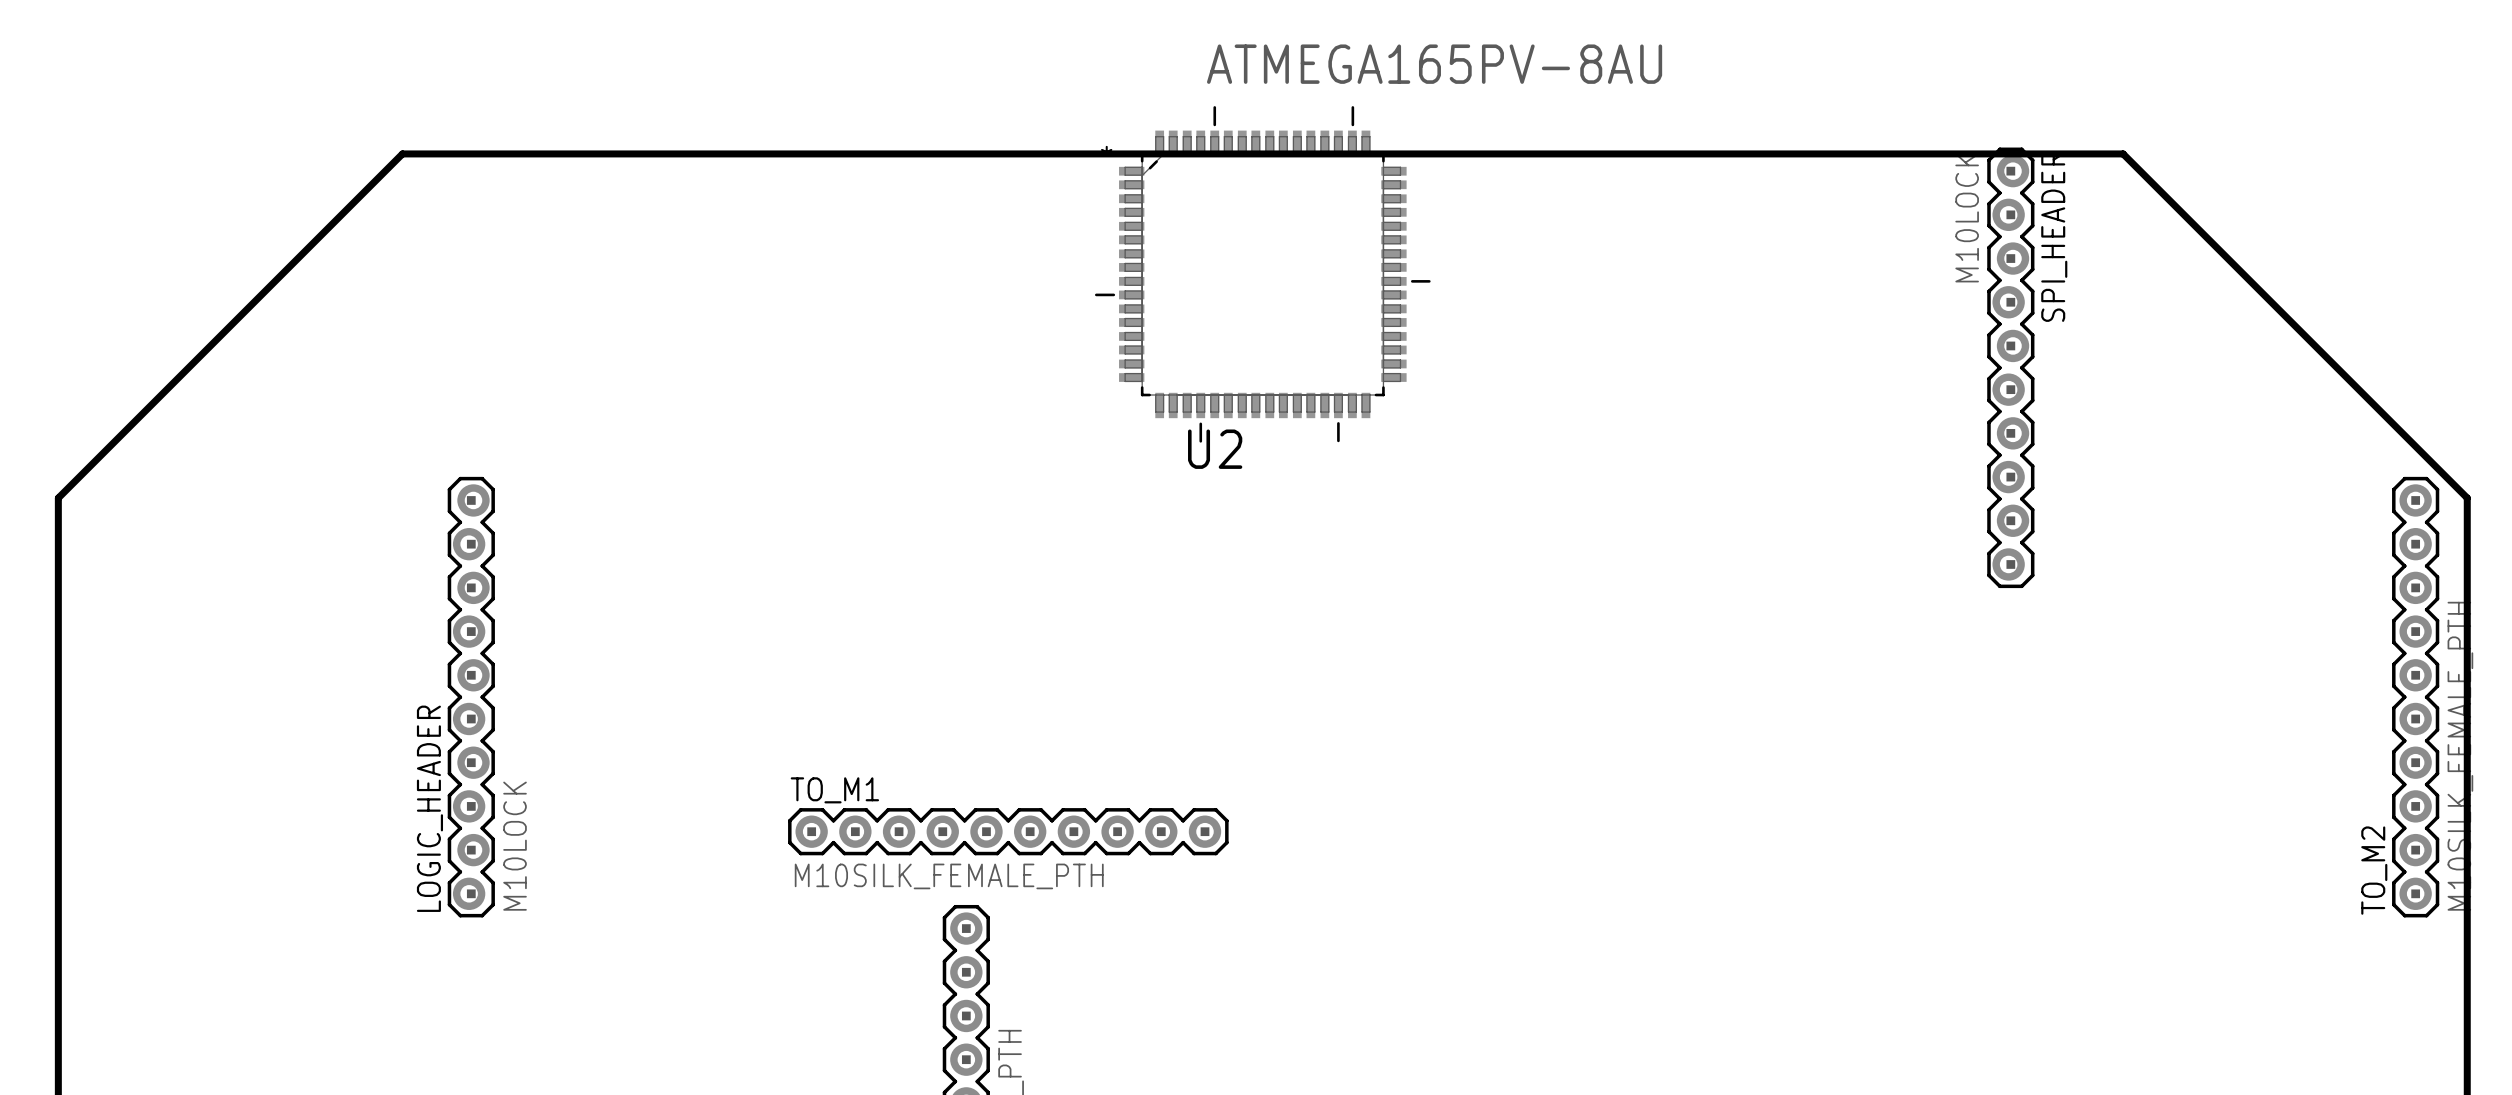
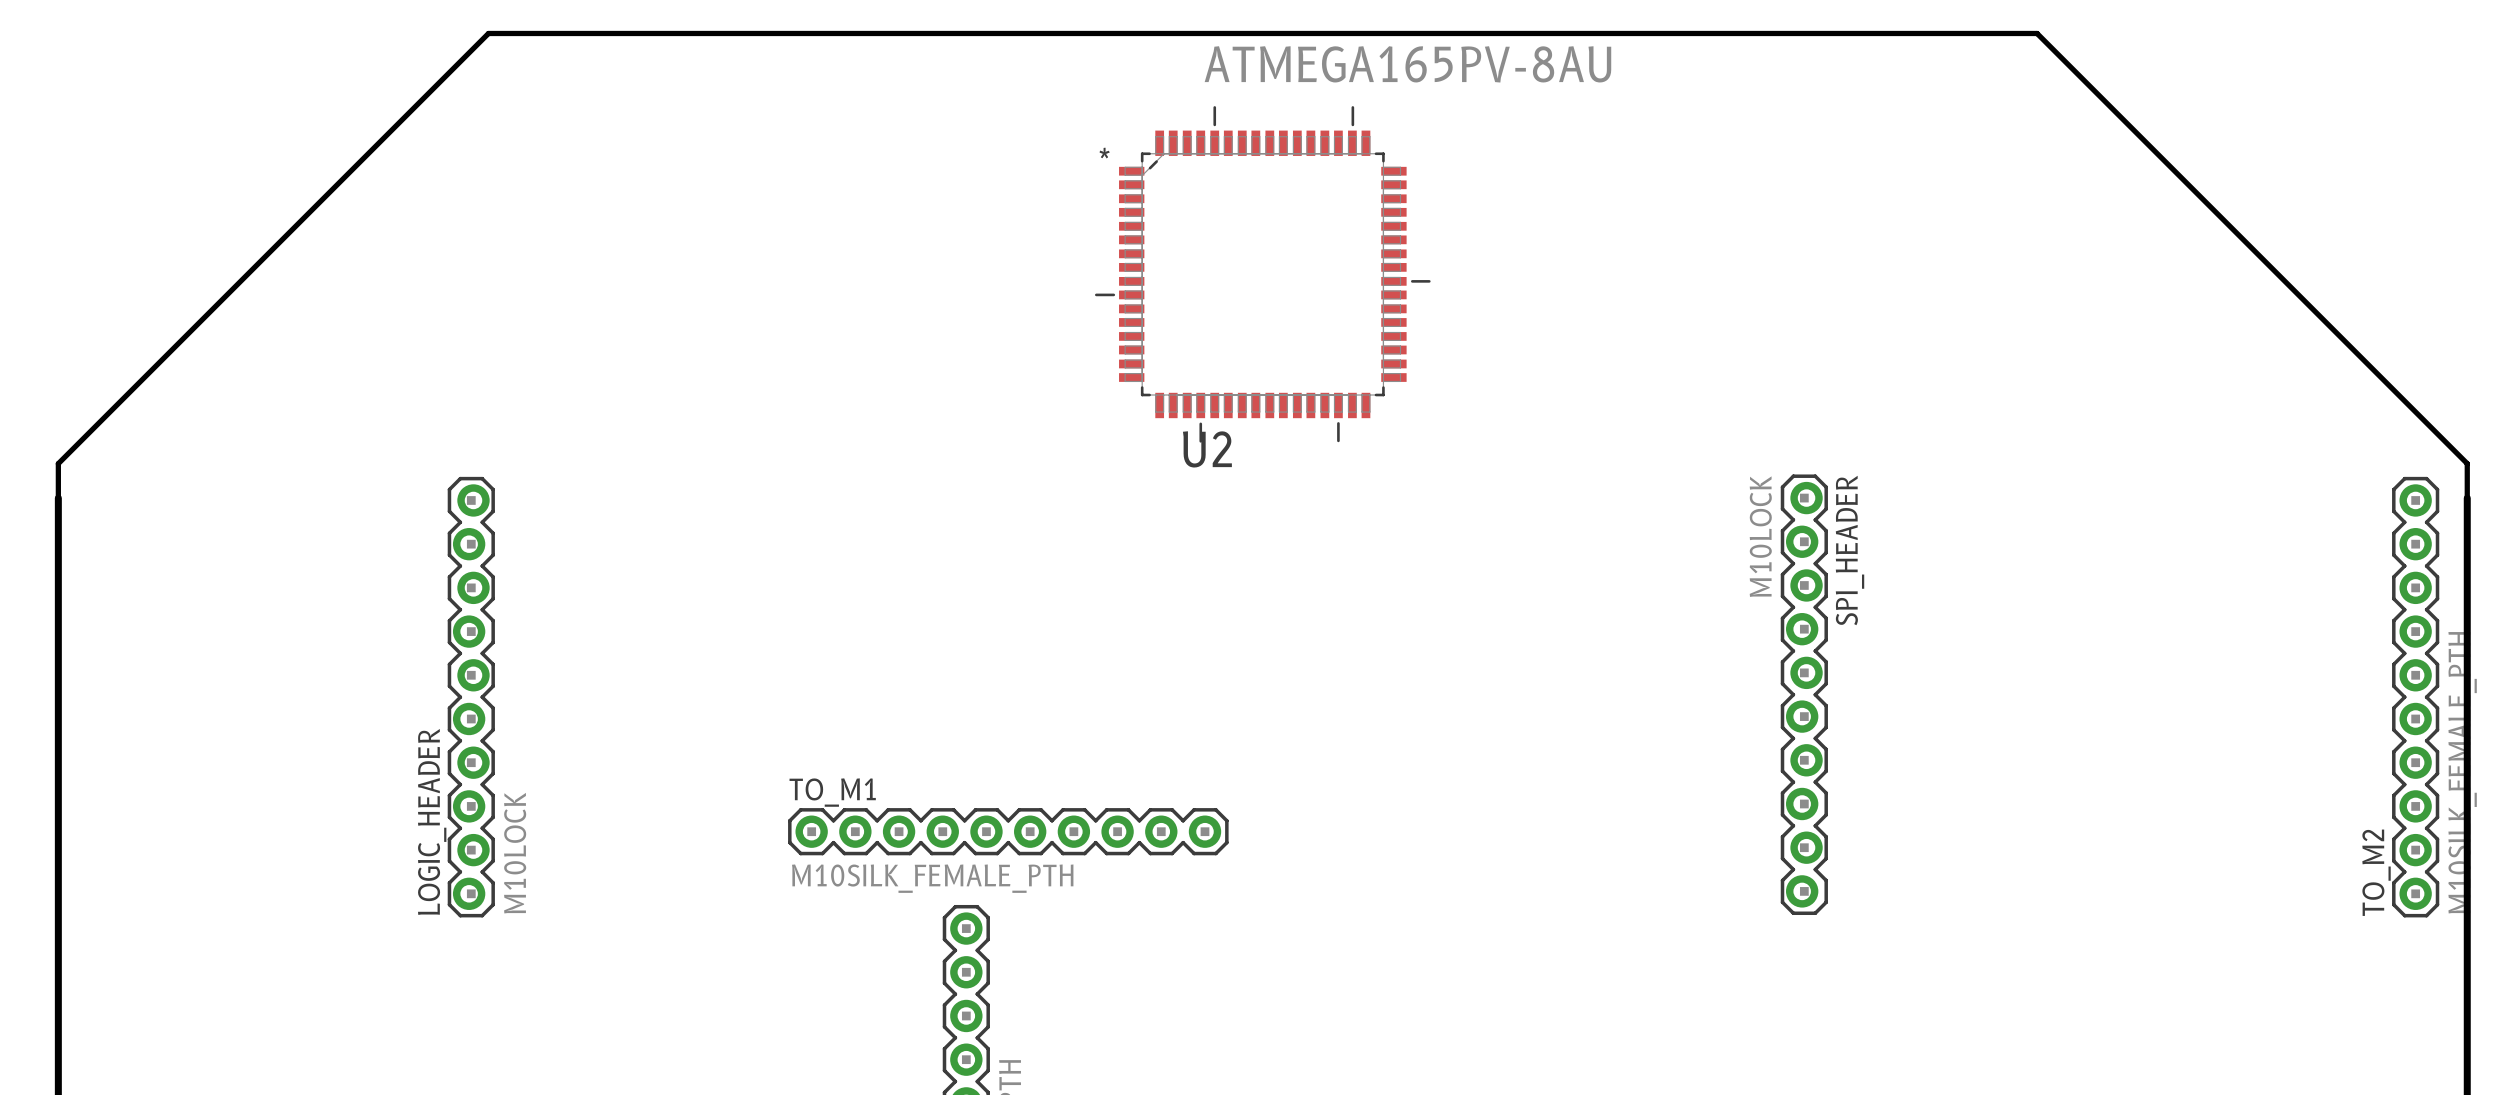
SPI_HEADER position: (2010, 367) -> (1804, 694)
board edge: (58, 498) (402, 153) (2123, 153) (2467, 498) -> (58, 498) (58, 463) (488, 33) (2037, 33) (2467, 463) (2467, 498)

